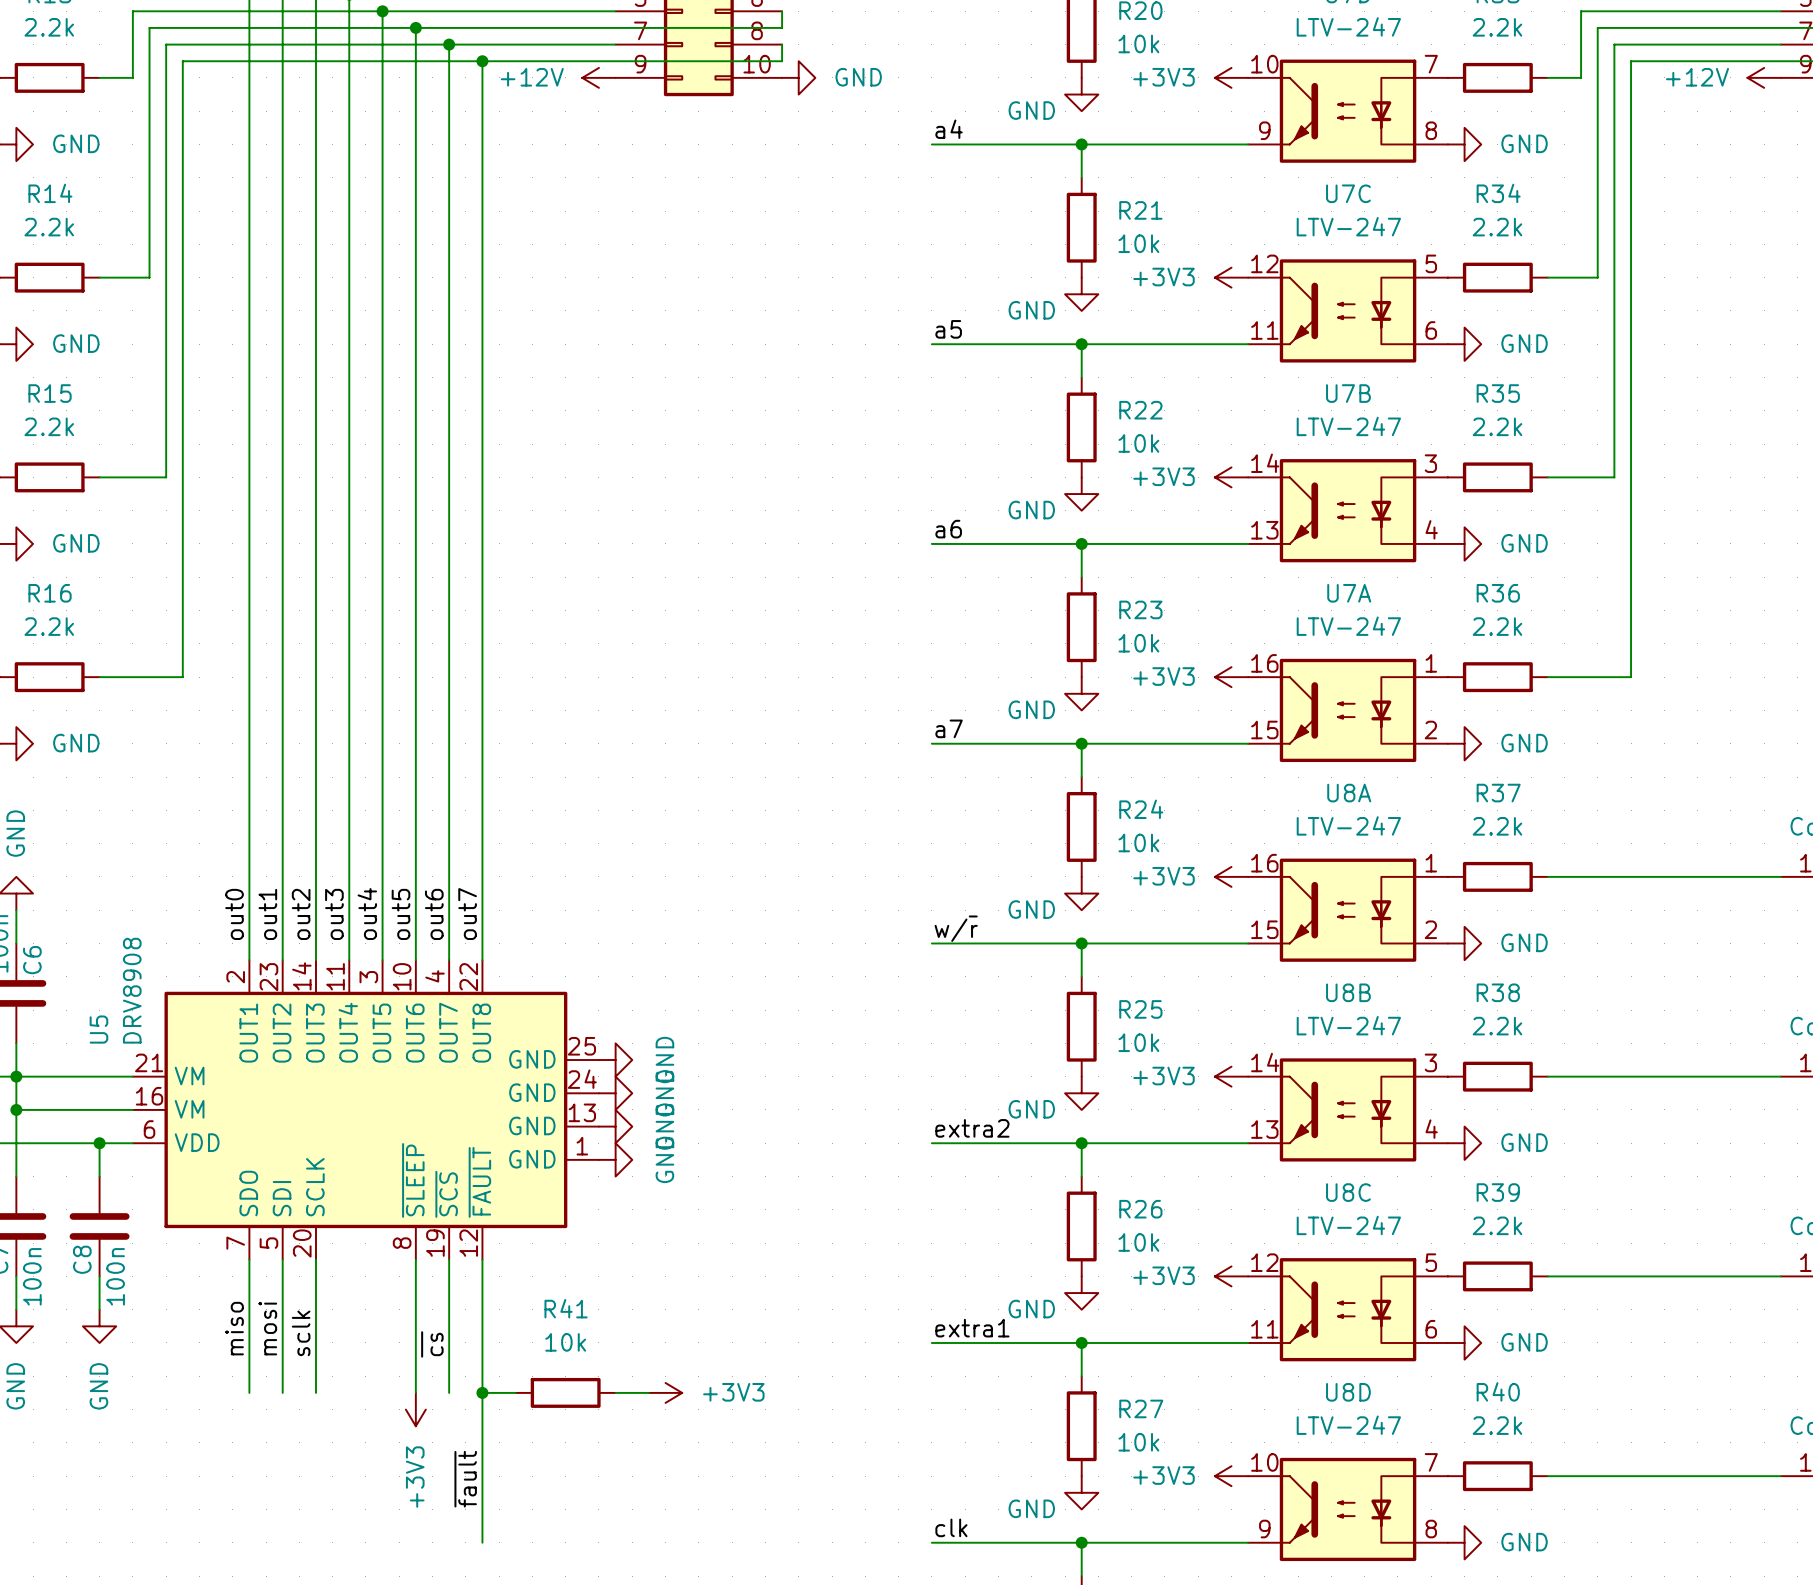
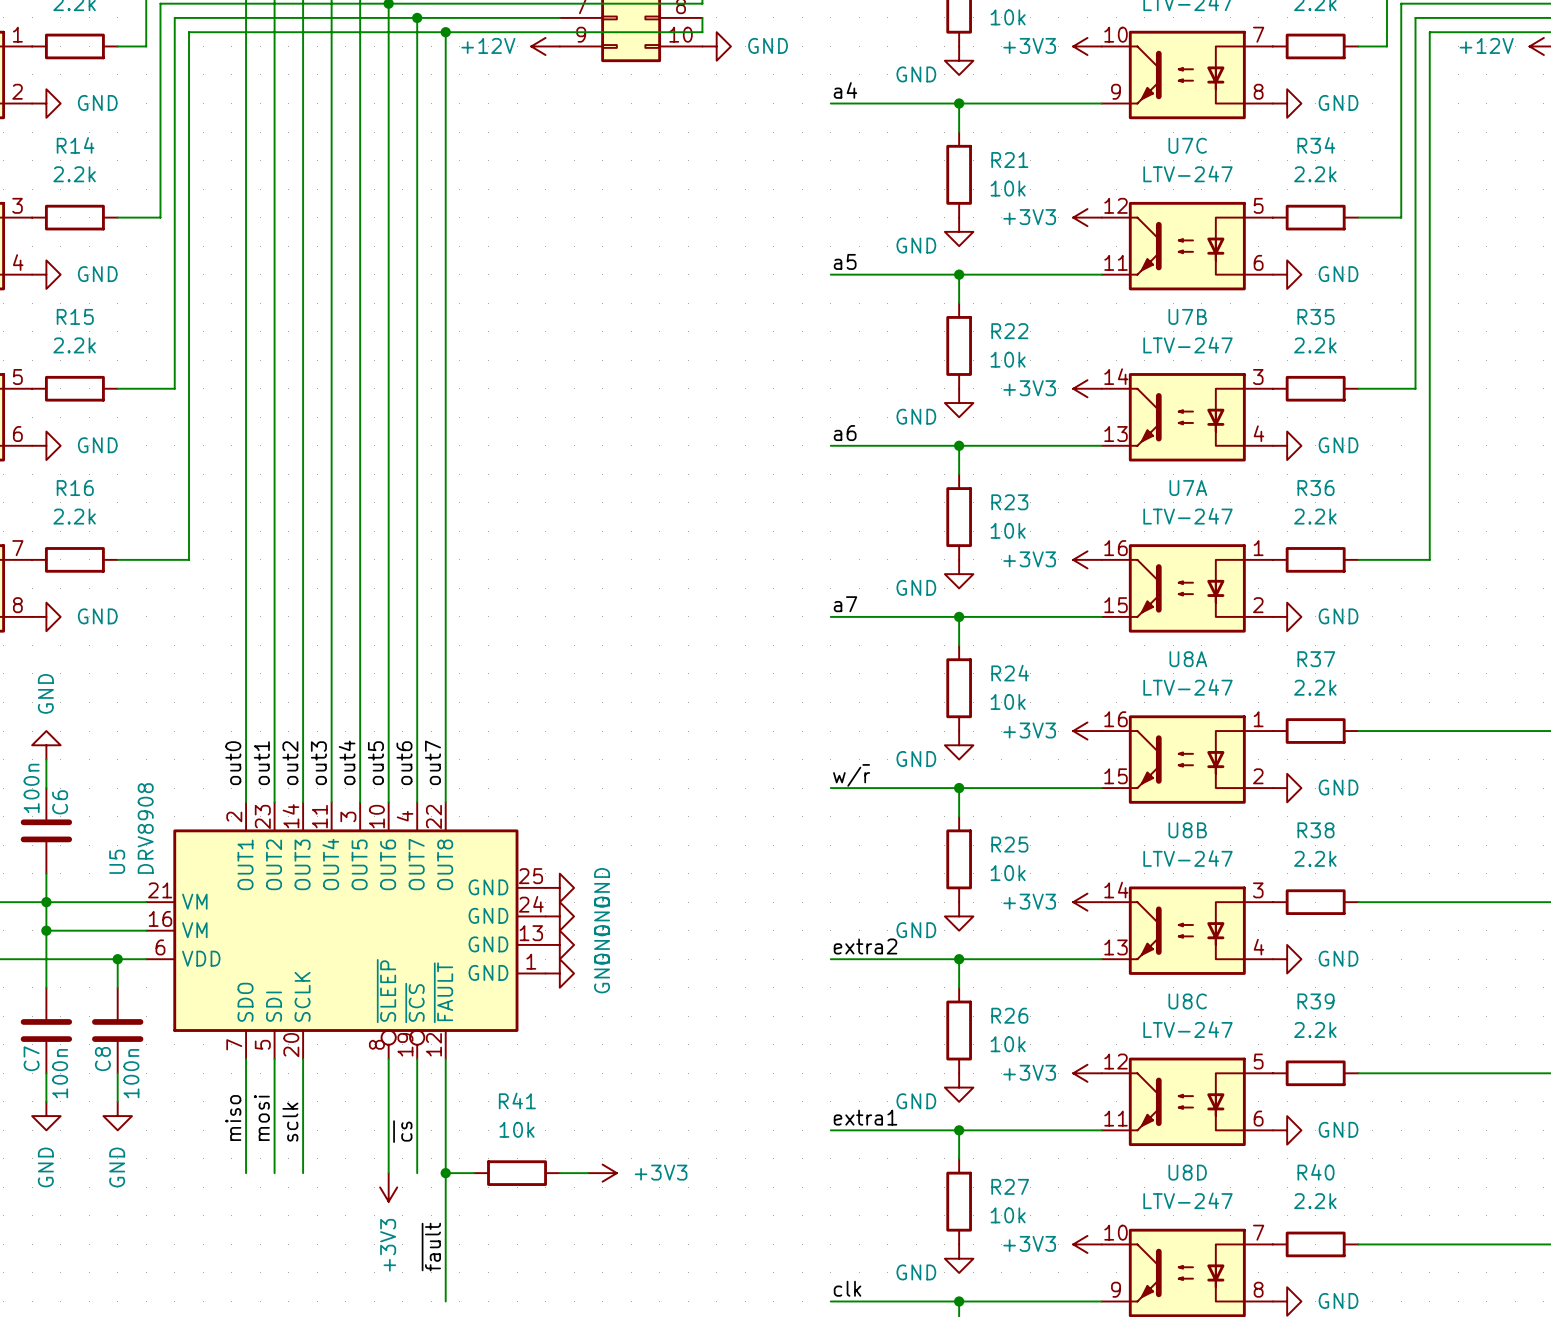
U5 symbol: [132, 960, 599, 1260] -> [146, 802, 546, 1060]

